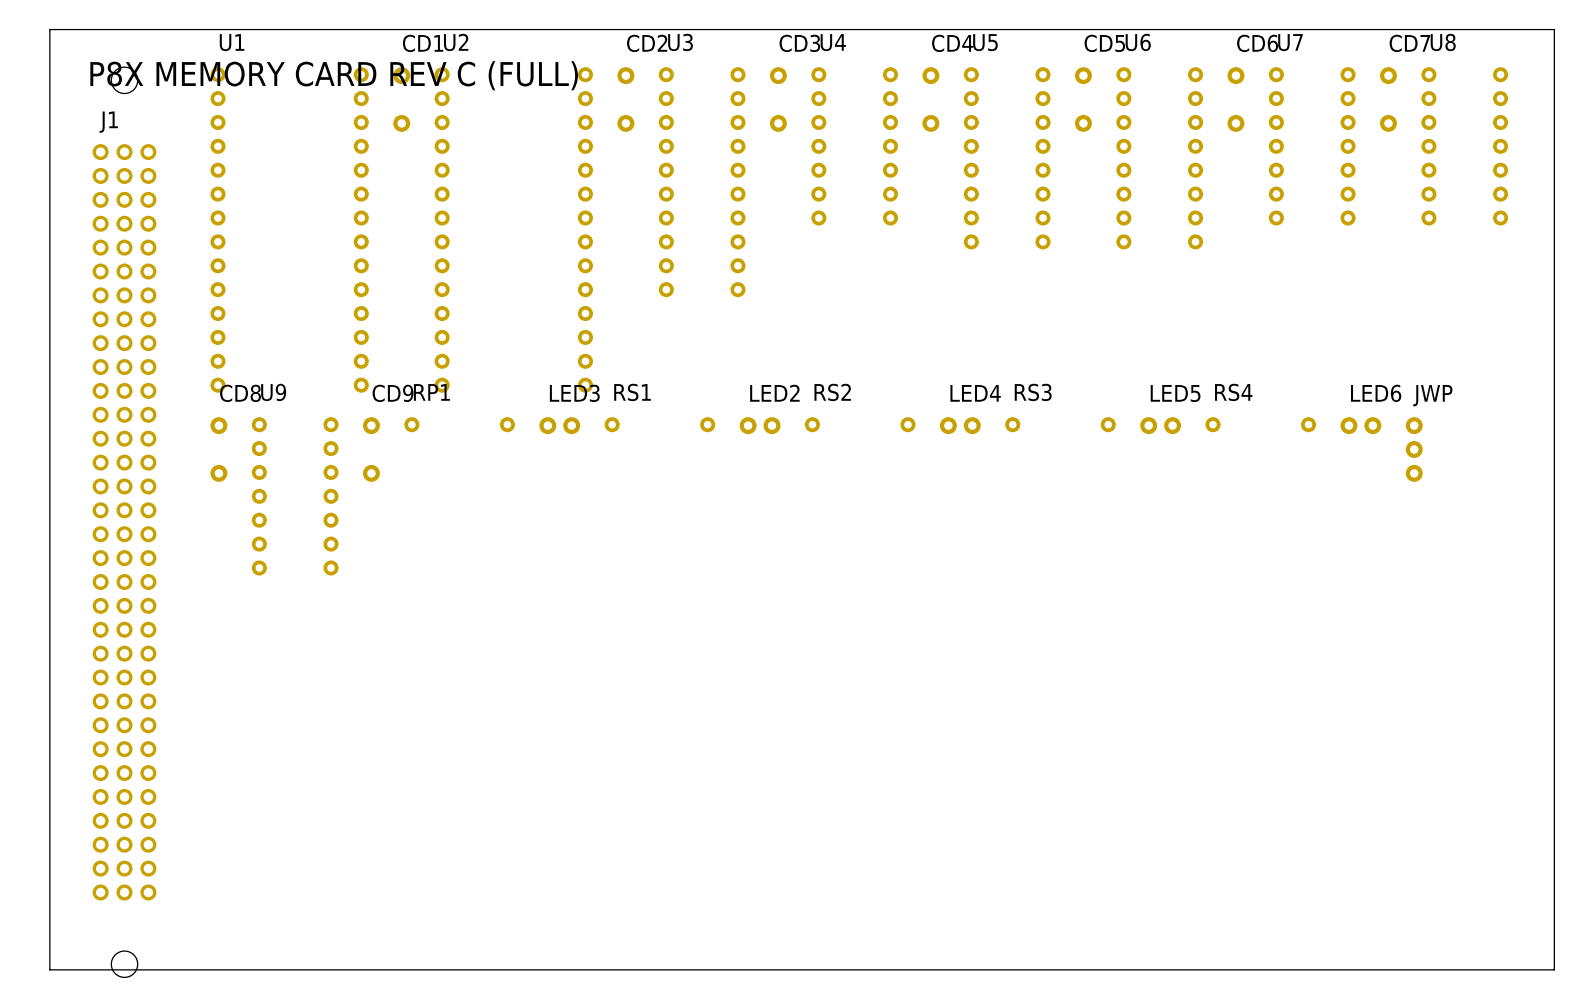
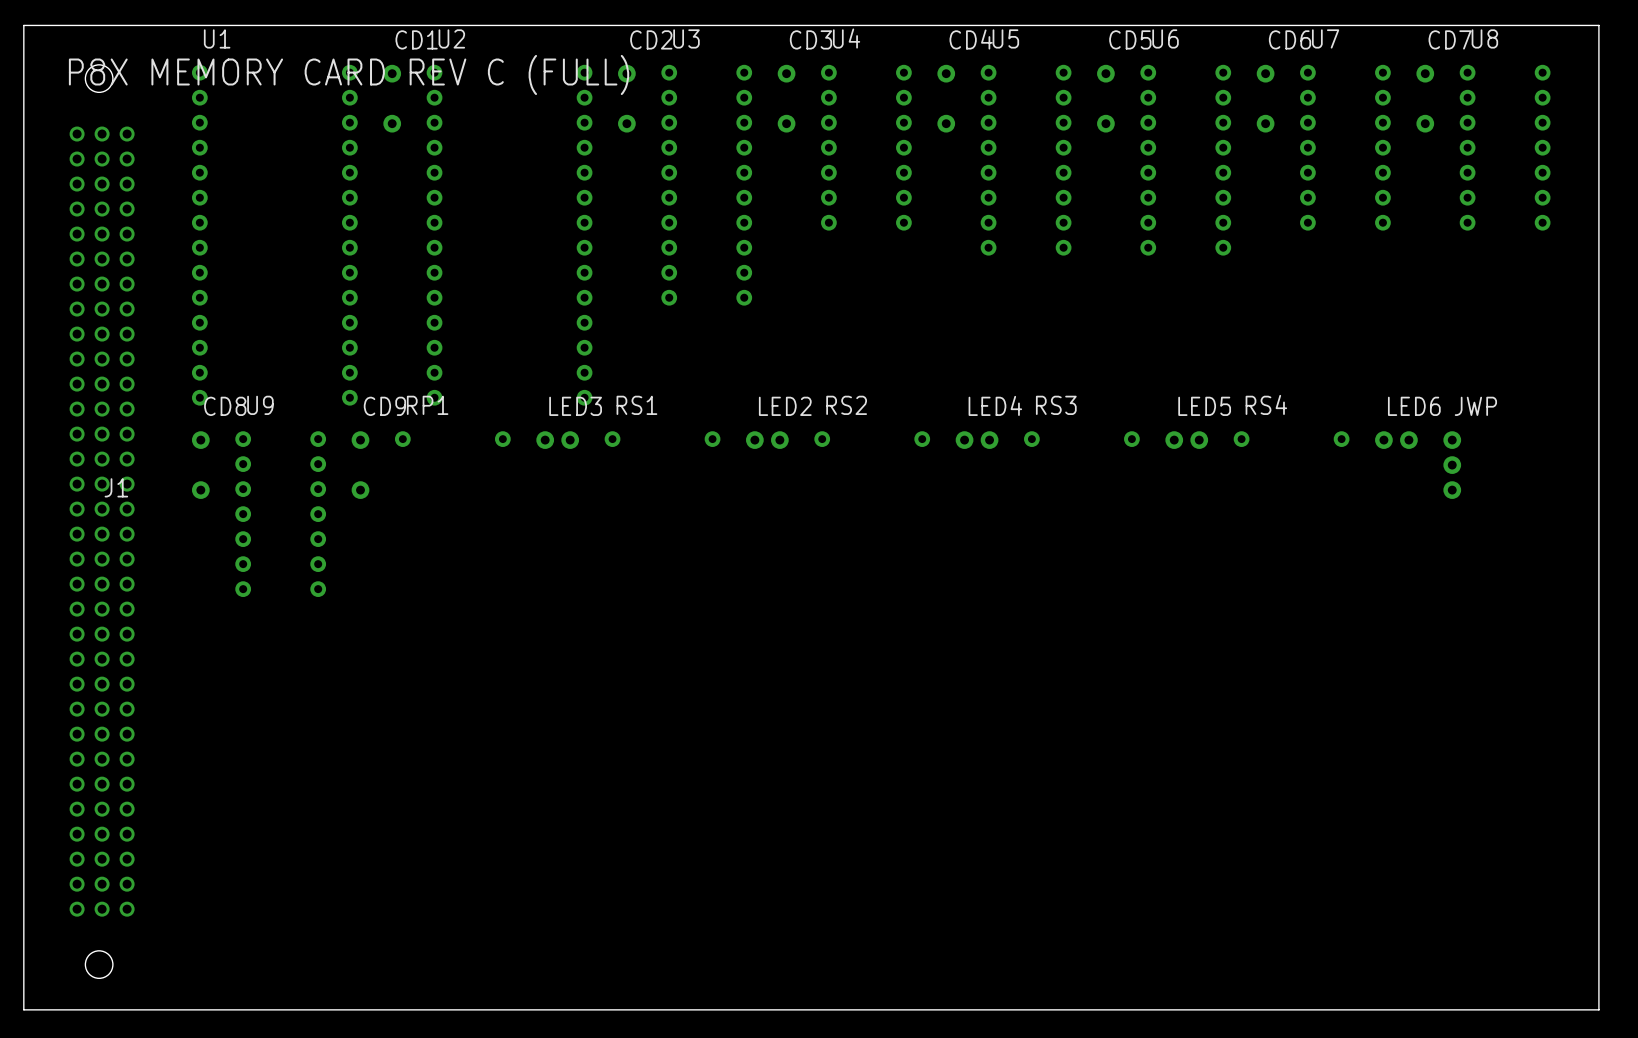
J1 footprint: [92, 67, 157, 978] -> [69, 64, 135, 979]
J1 name position: J1 (108, 122) -> J1 (116, 487)

